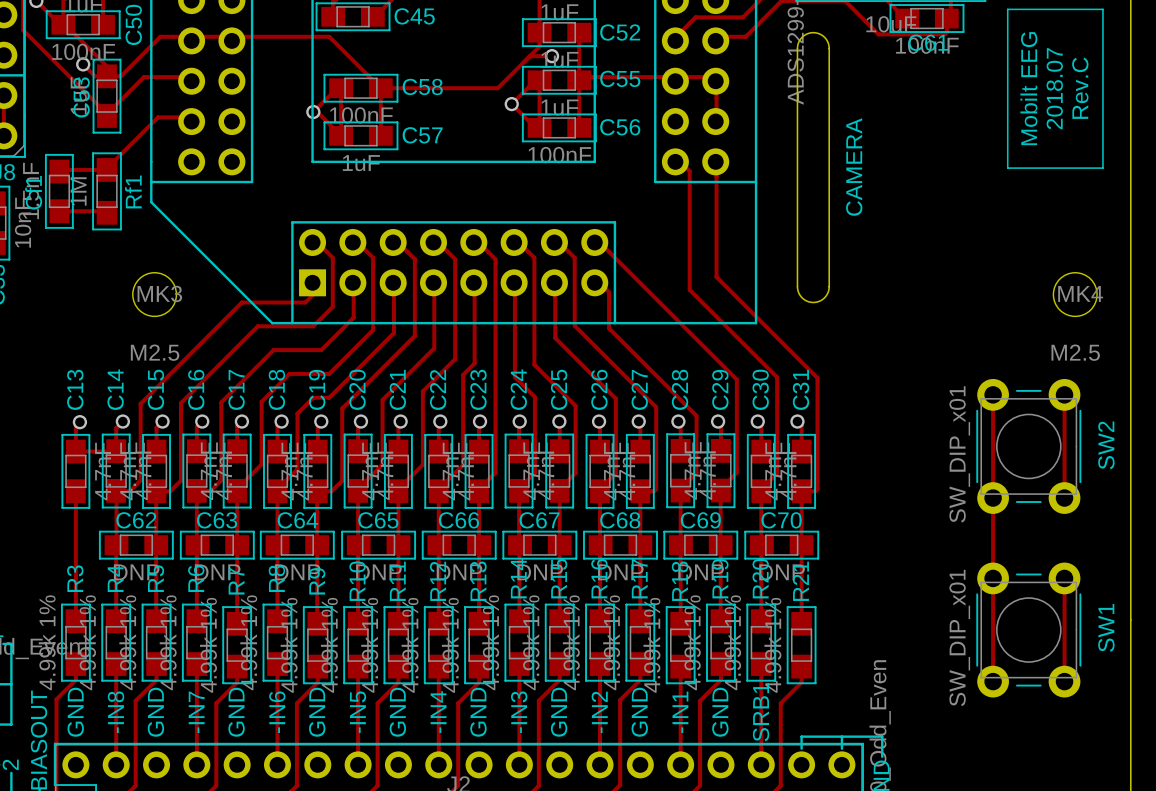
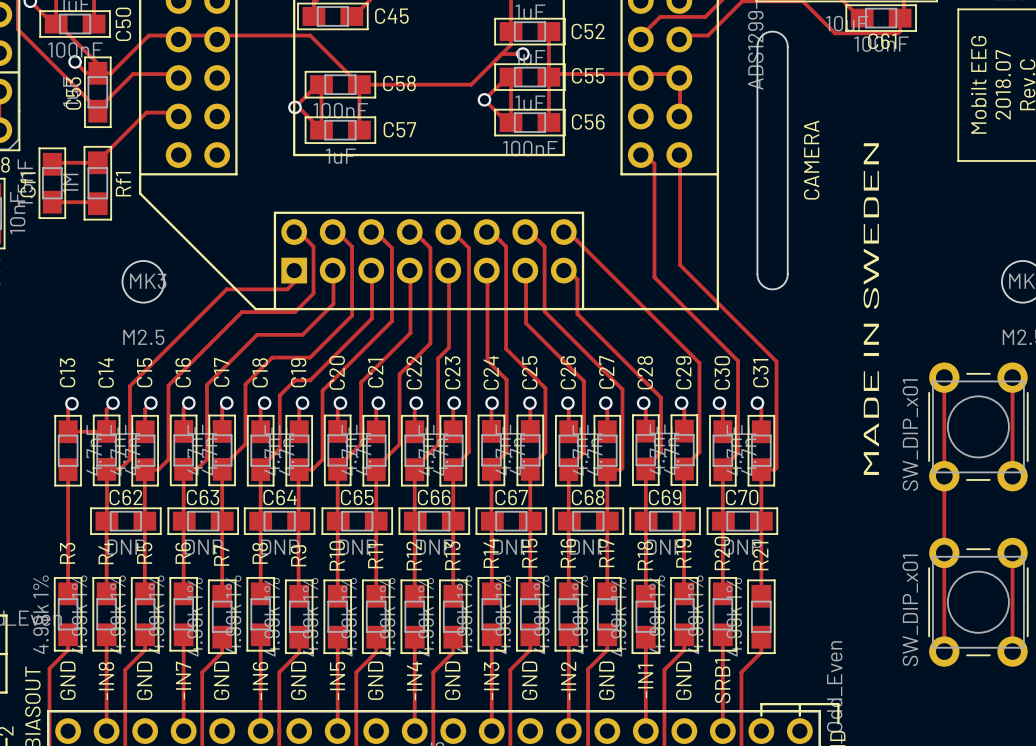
text: none -> MADE IN SWEDEN (871, 309)

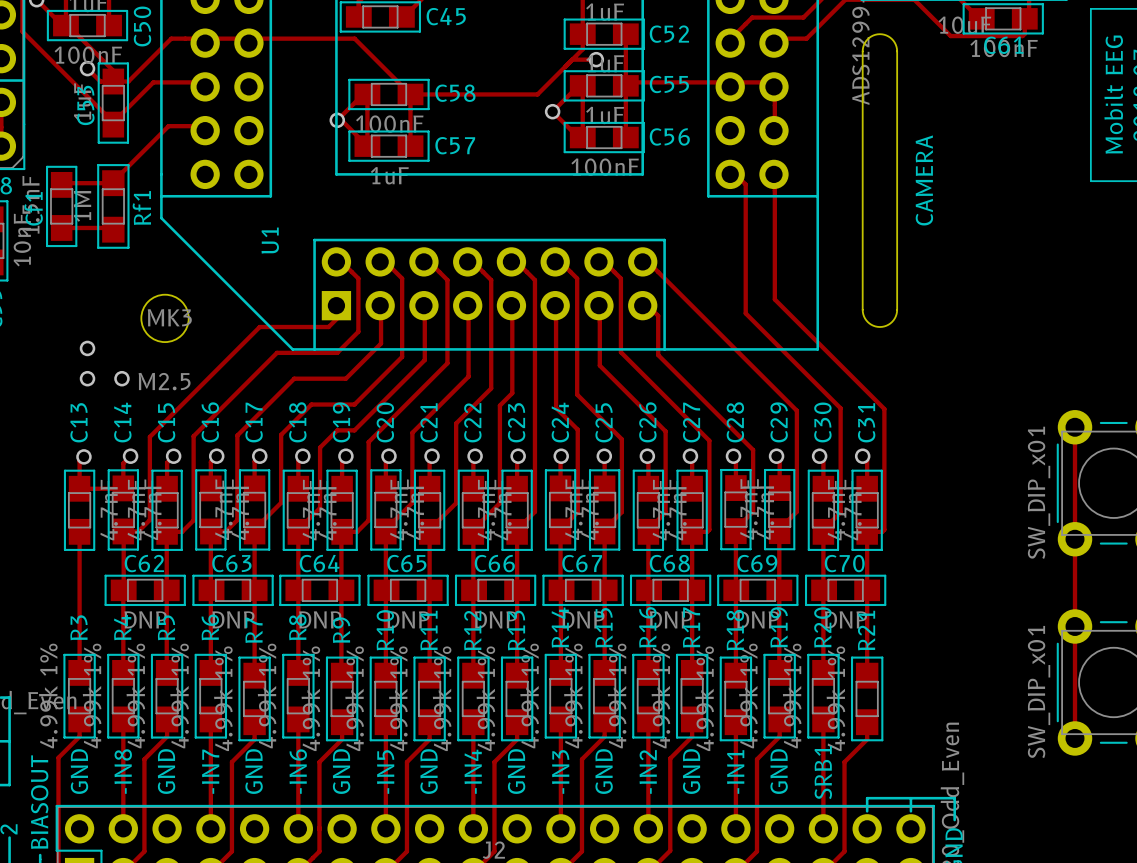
U1 name: none -> U1 (270, 240)
via: none -> (87, 348)
text: MADE IN SWEDEN (871, 309) -> none
via: none -> (87, 378)
via: none -> (121, 378)

